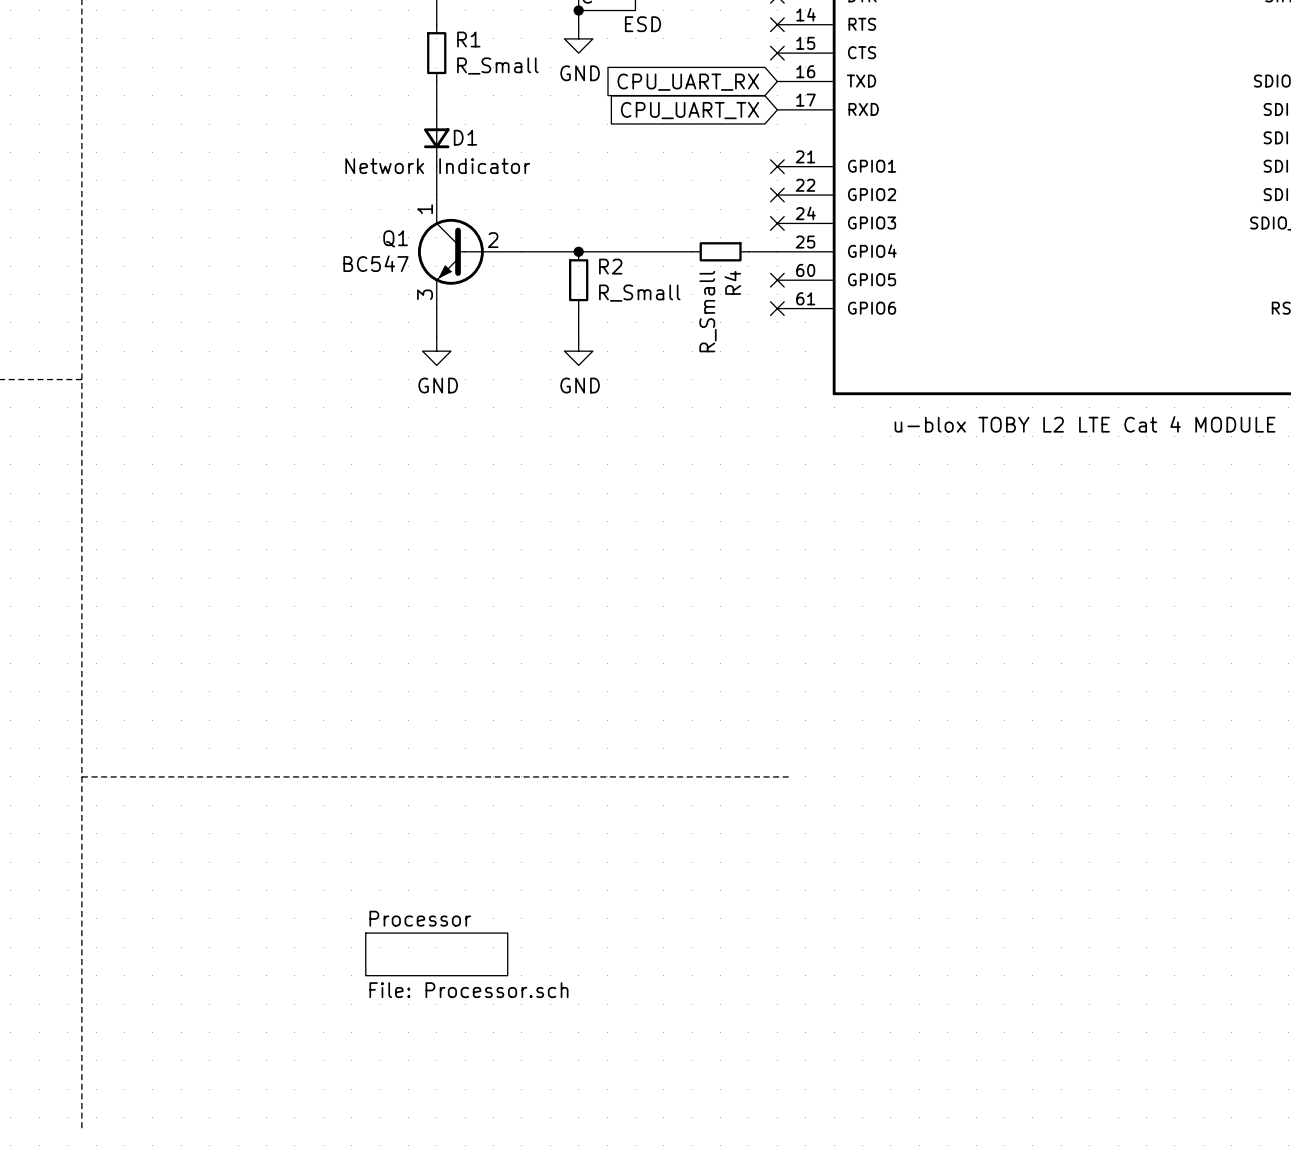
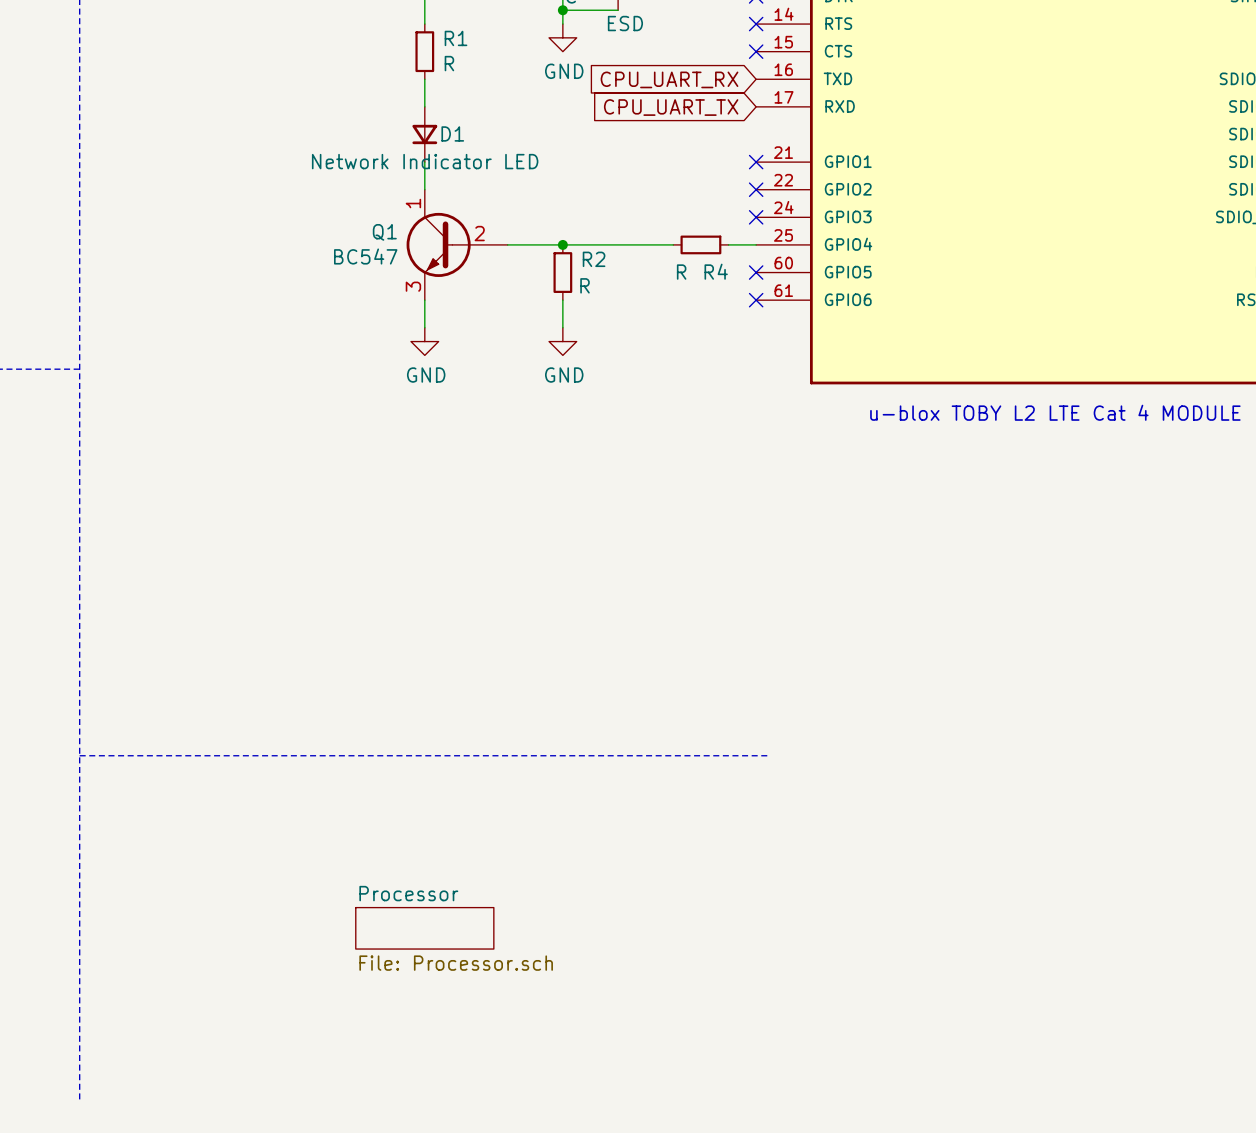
R1 value: R_Small (497, 66) -> R (449, 63)
D1 value: Network Indicator (437, 166) -> Network Indicator LED (425, 161)
R4 name rotation: 0° (732, 282) -> 90° clockwise (716, 271)
R2 value: R_Small (639, 293) -> R (585, 285)
R4 value: R_Small (707, 311) -> R (681, 272)

